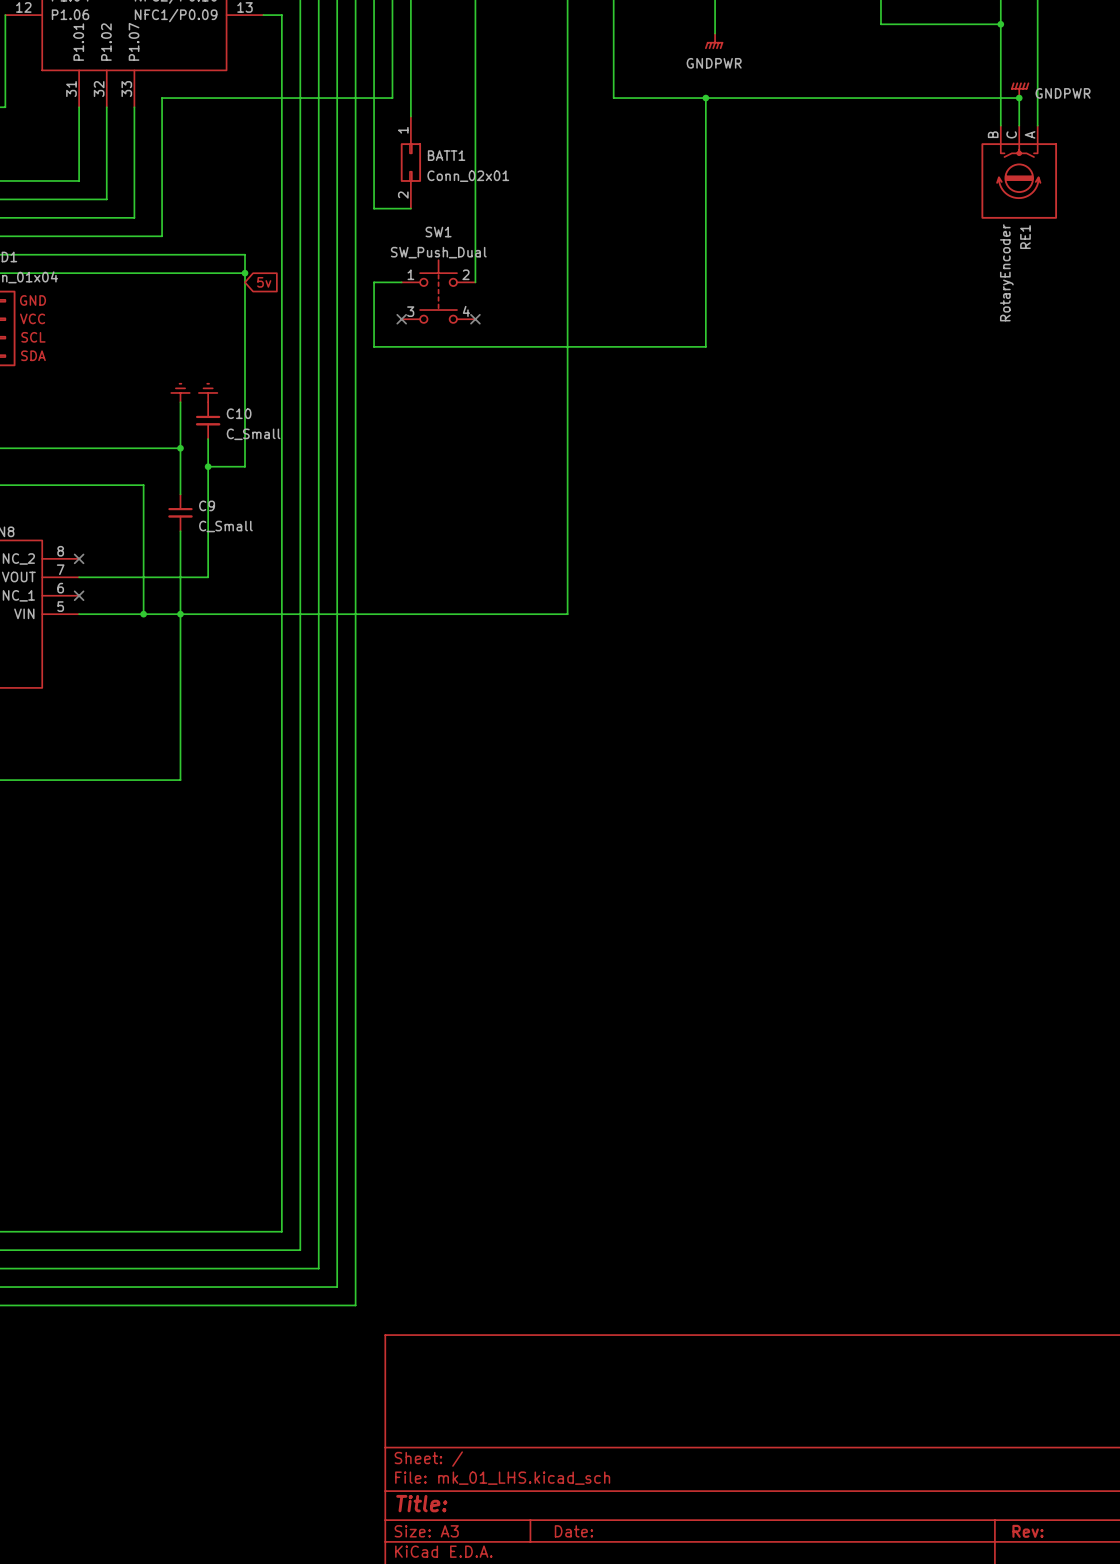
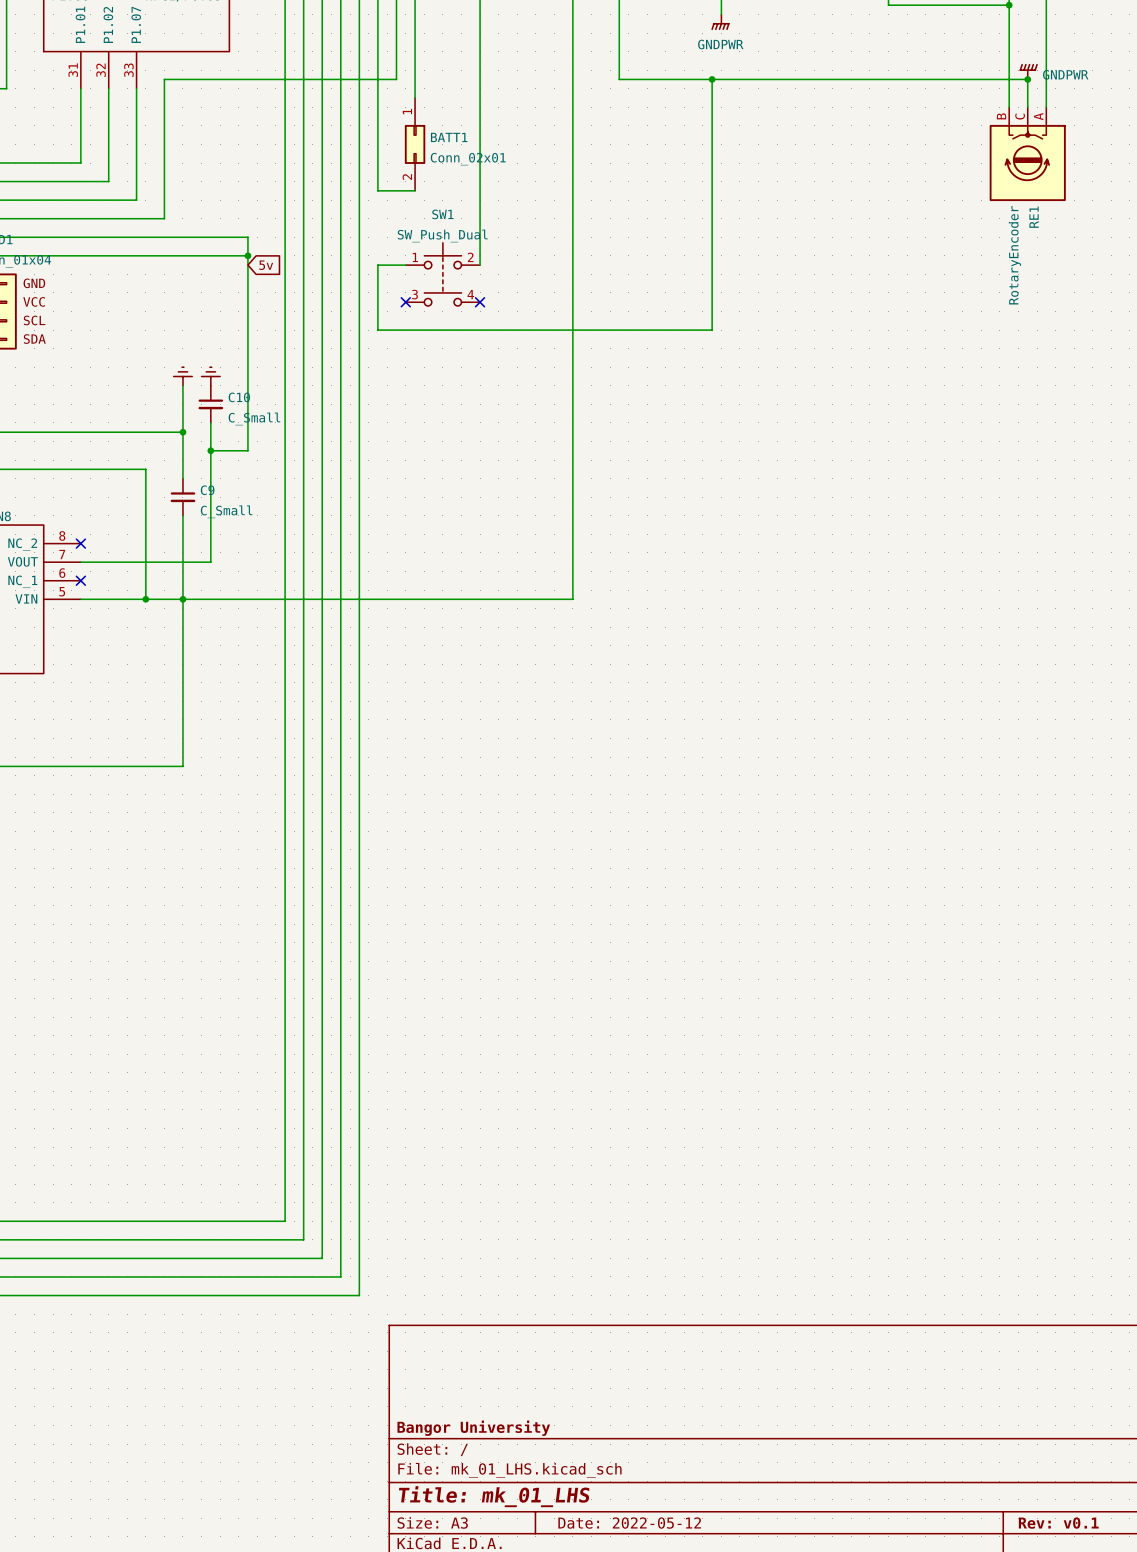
title block: none -> Bangor University (473, 1428)
title block: Title: (421, 1503) -> Title: mk_01_LHS (494, 1496)
title block: Date: (573, 1531) -> Date: 2022-05-12 (629, 1523)
title block: Rev: (1027, 1531) -> Rev: v0.1 (1058, 1523)

